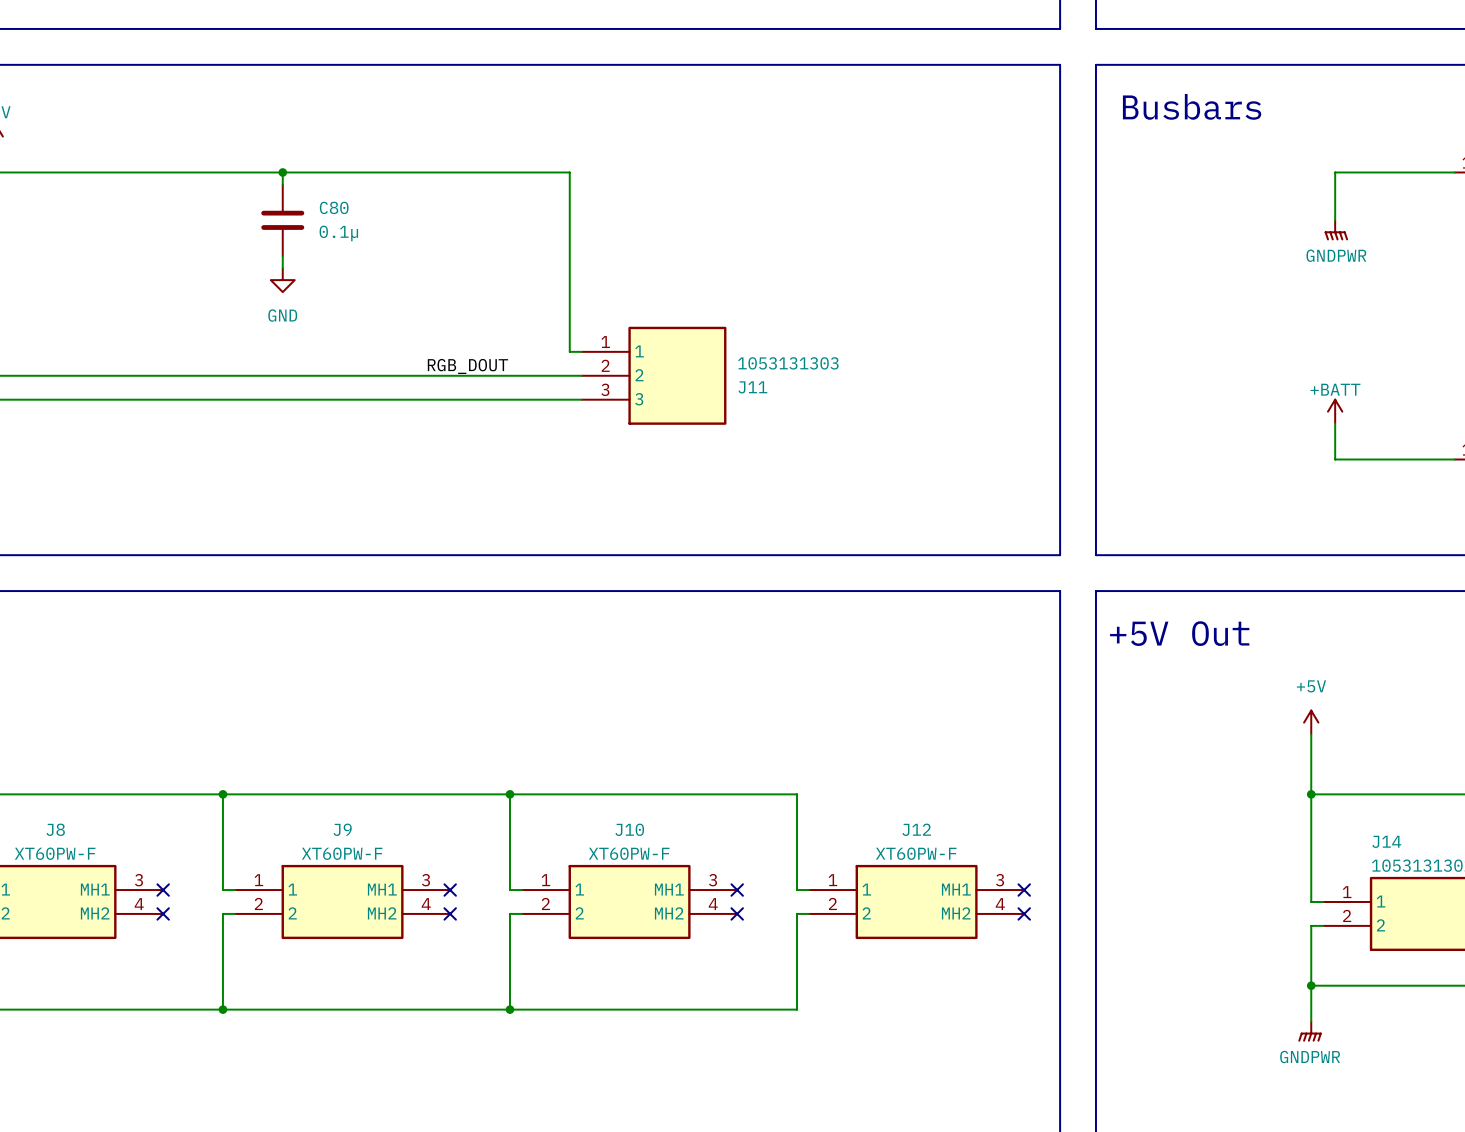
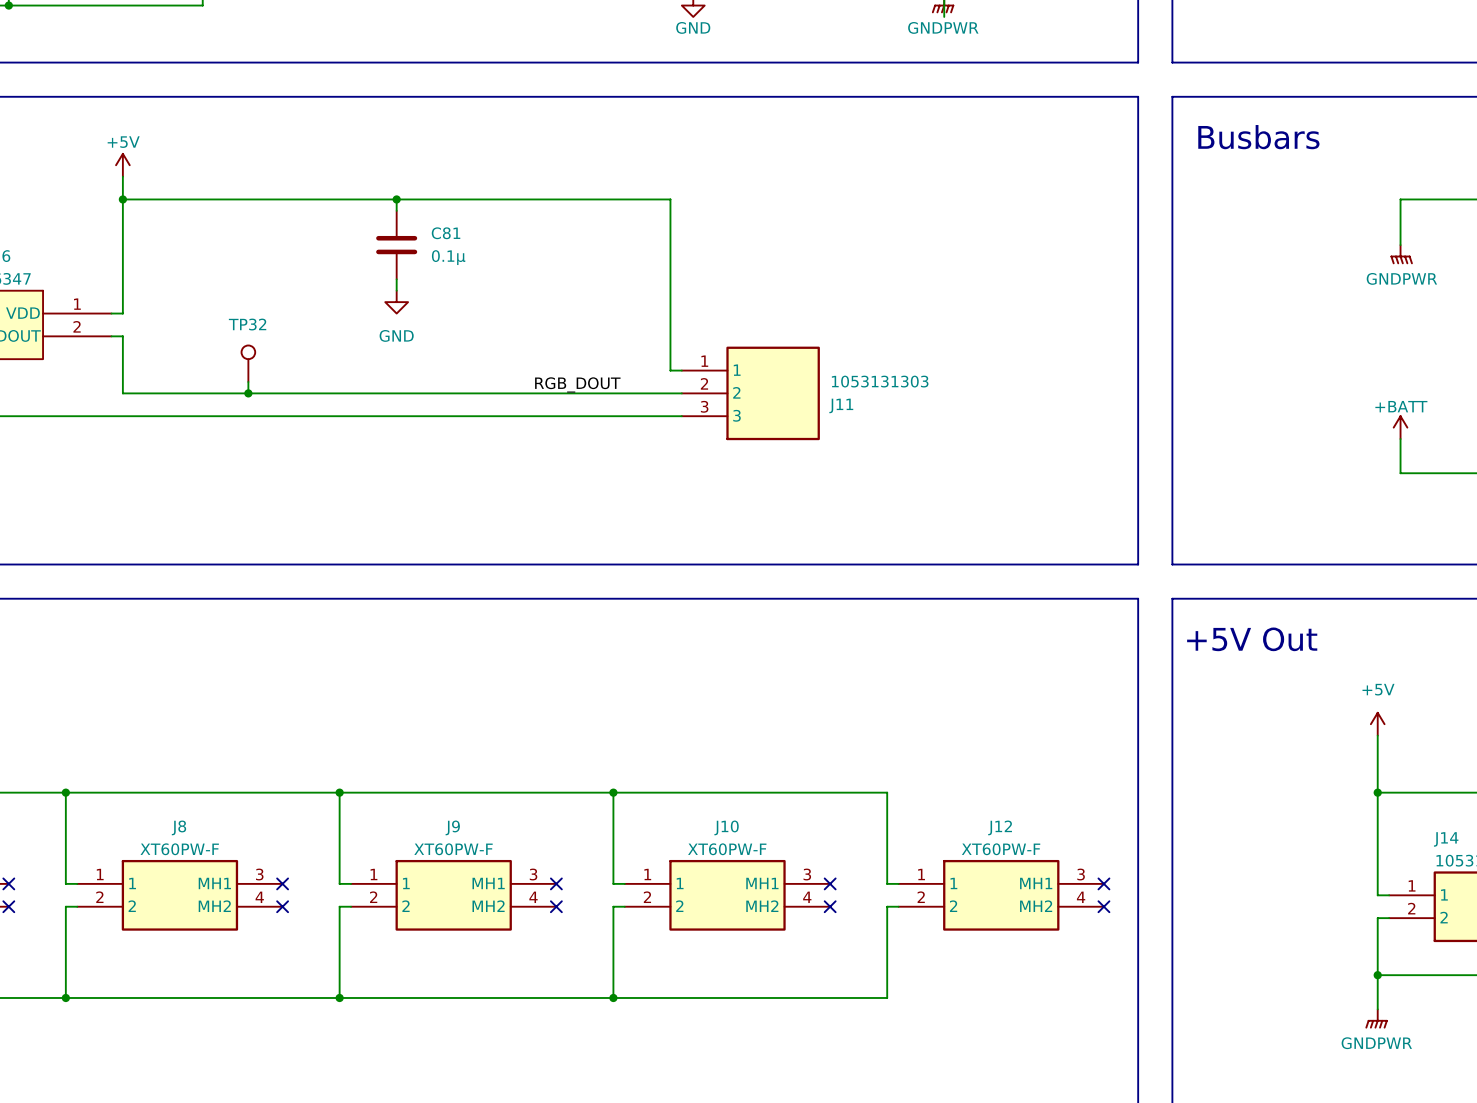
C80 name: C80 (334, 207) -> C81 (446, 233)
TP32: none -> (248, 363)
wire: none -> (248, 381) (248, 393)
junction: none -> (248, 393)

